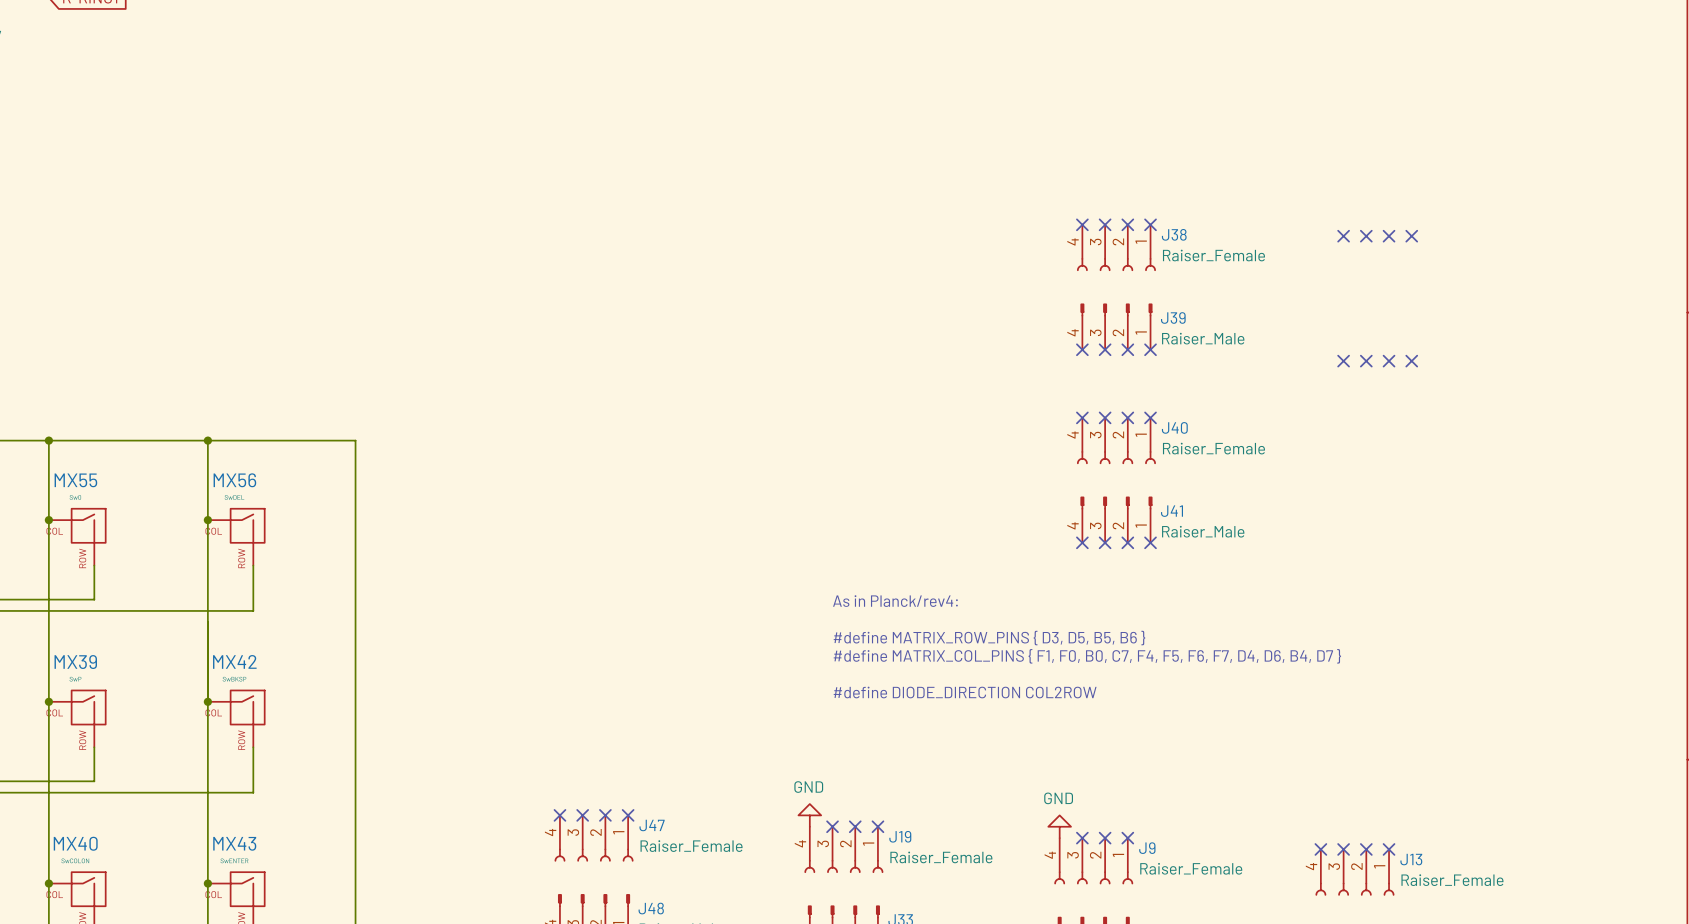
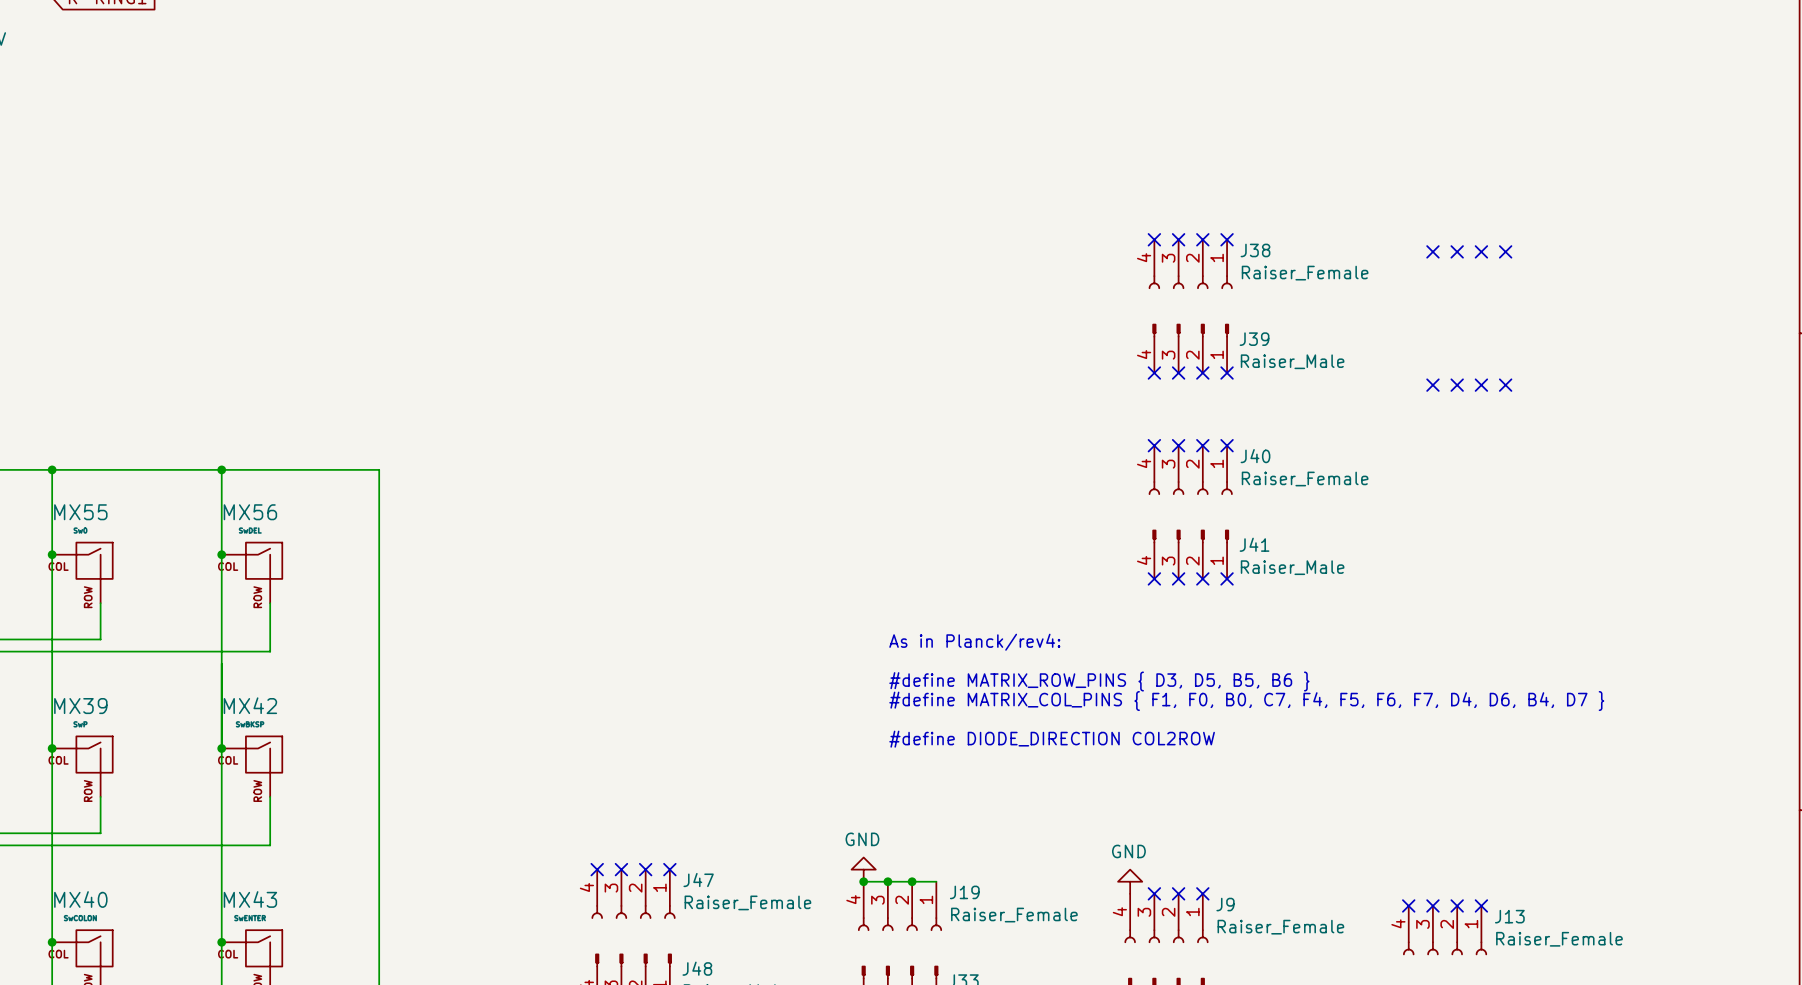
wire: none -> (863, 881) (936, 881)
junction: none -> (863, 881)
no-connect mark: (832, 826) -> none
junction: none -> (887, 881)
no-connect mark: (855, 826) -> none
junction: none -> (912, 881)
no-connect mark: (877, 826) -> none

